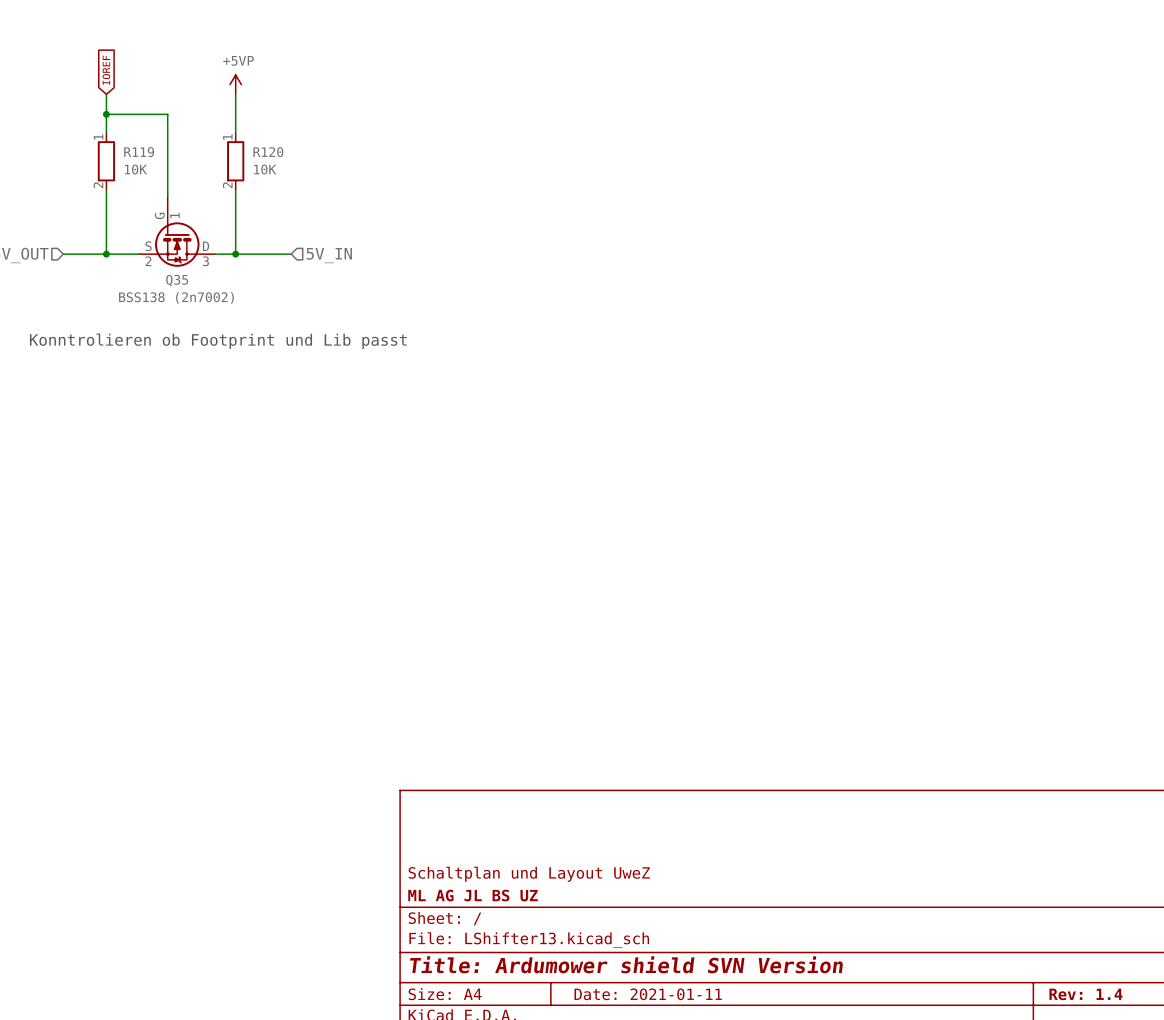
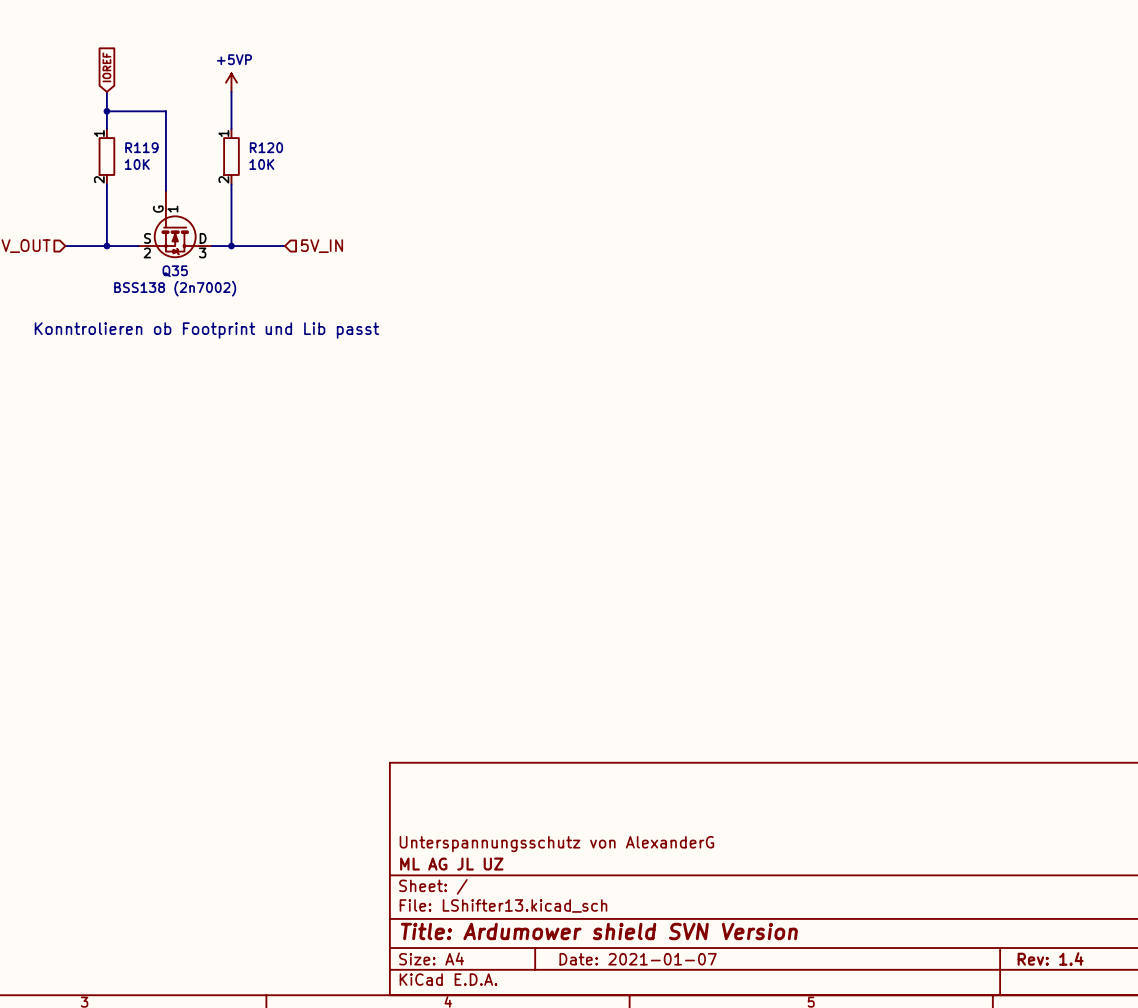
title block: Schaltplan und Layout UweZ (529, 874) -> Unterspannungsschutz von AlexanderG (556, 844)
title block: ML AG JL BS UZ (473, 895) -> ML AG JL UZ (451, 864)
title block: Date: 2021-01-11 (648, 994) -> Date: 2021-01-07 (638, 959)

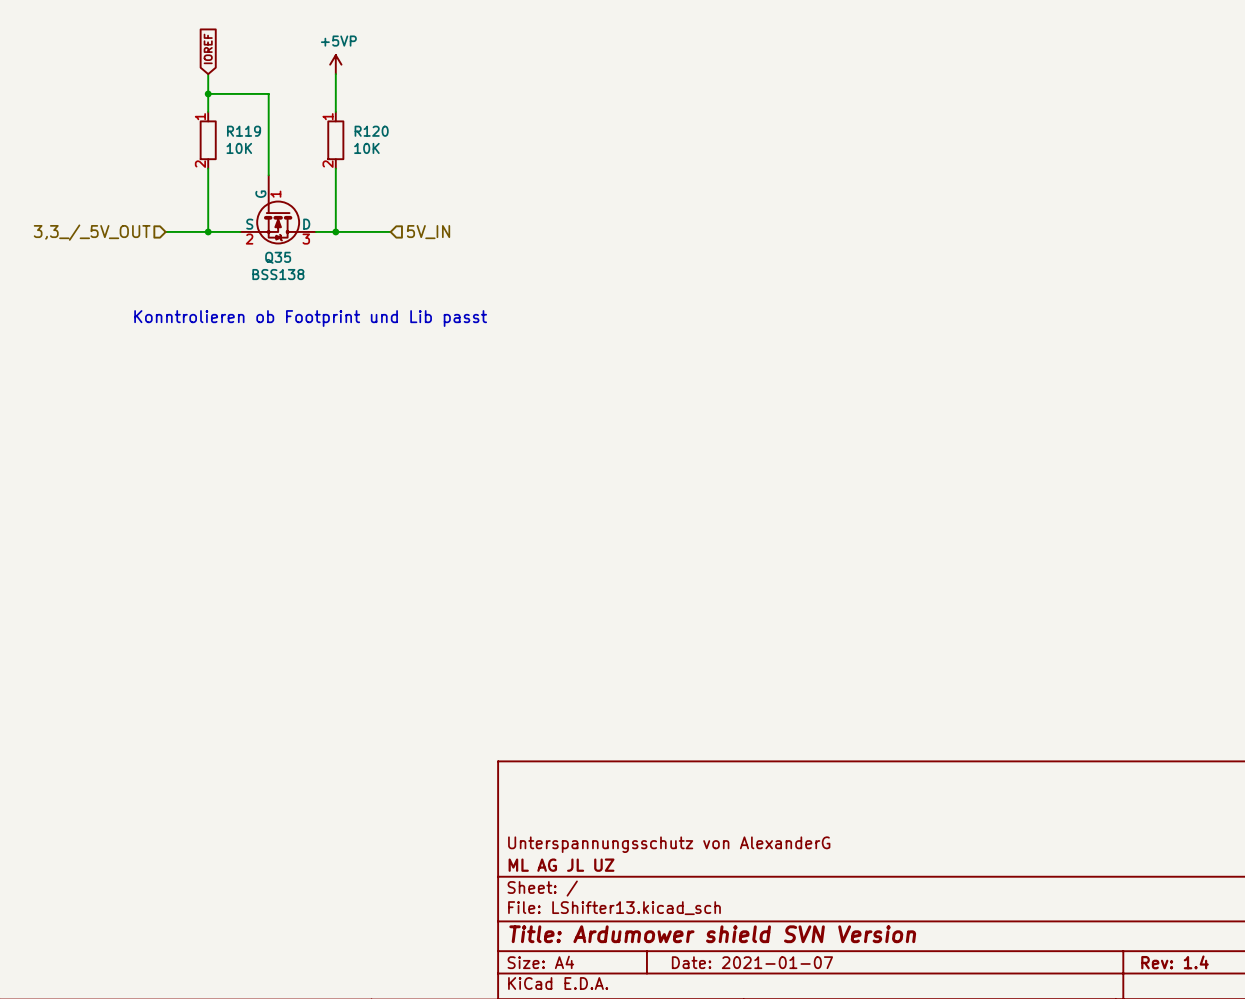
Q35 value: BSS138 (2n7002) (175, 288) -> BSS138 (278, 274)

